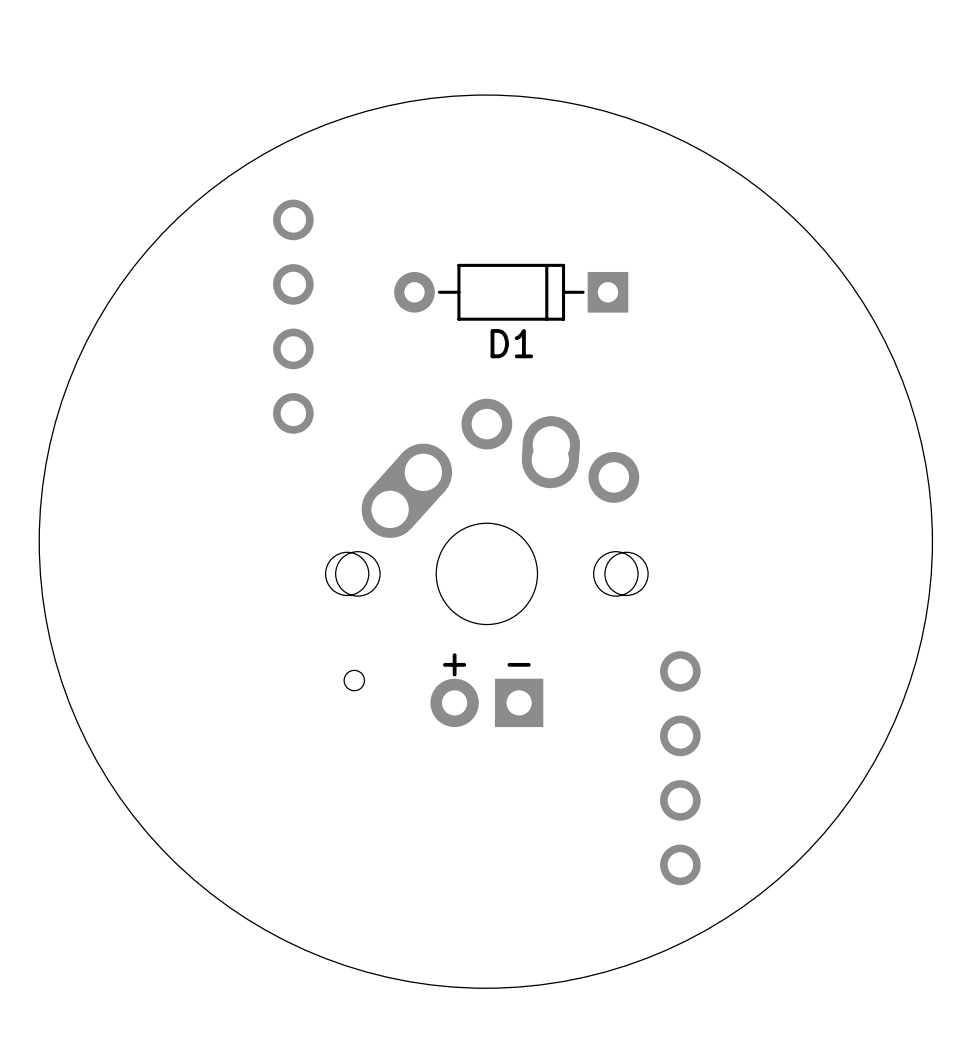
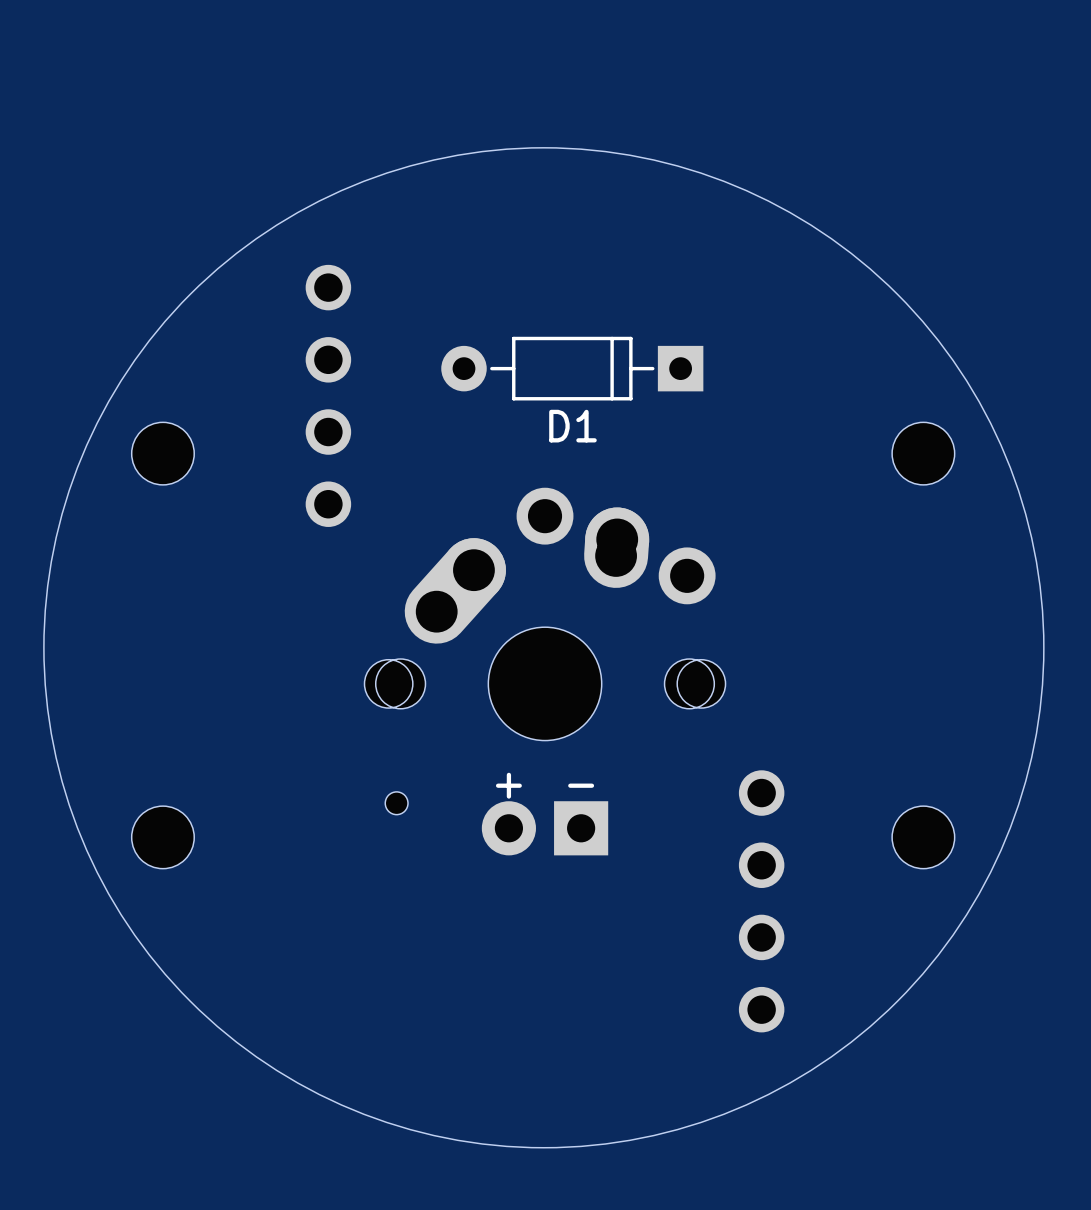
part: none -> (162, 453)
part: none -> (923, 453)
part: none -> (162, 837)
part: none -> (923, 837)

